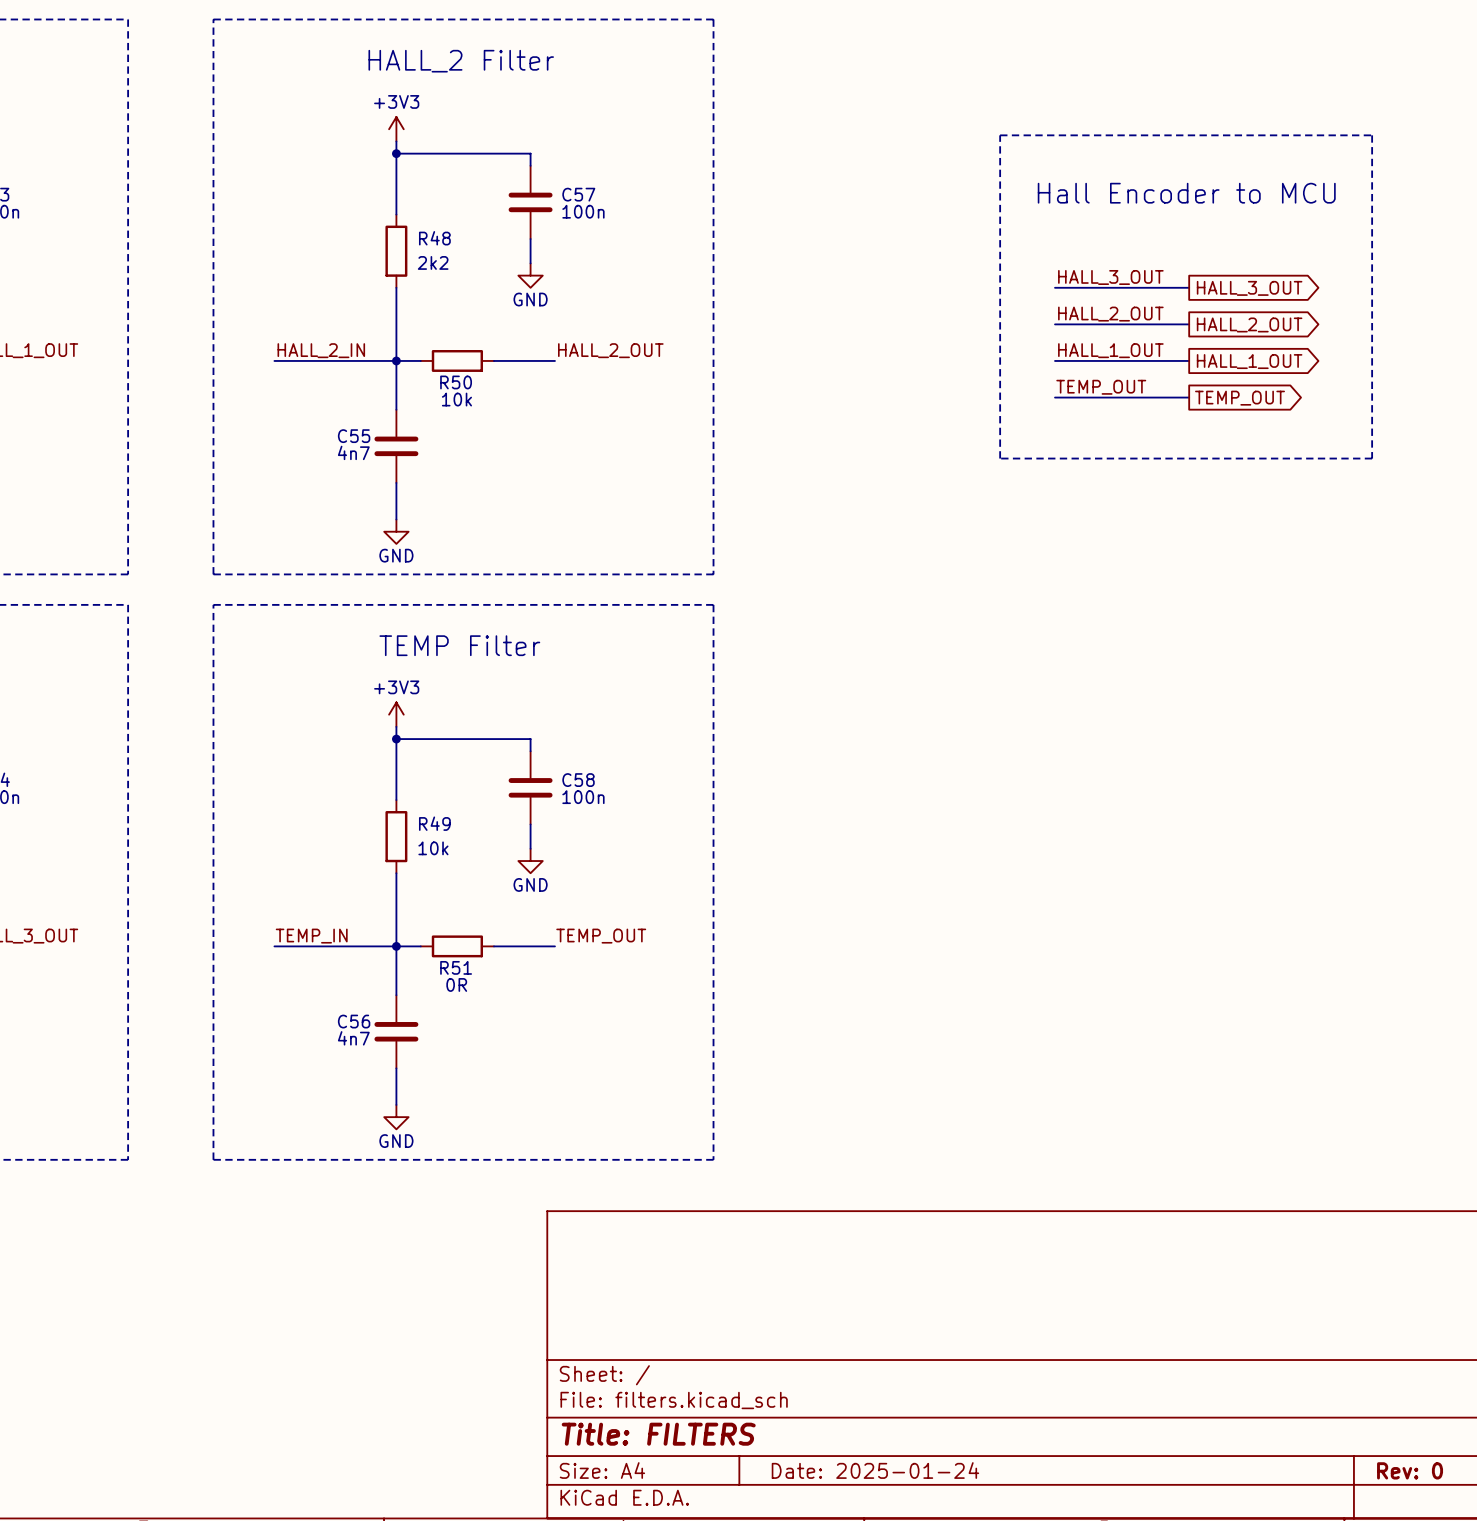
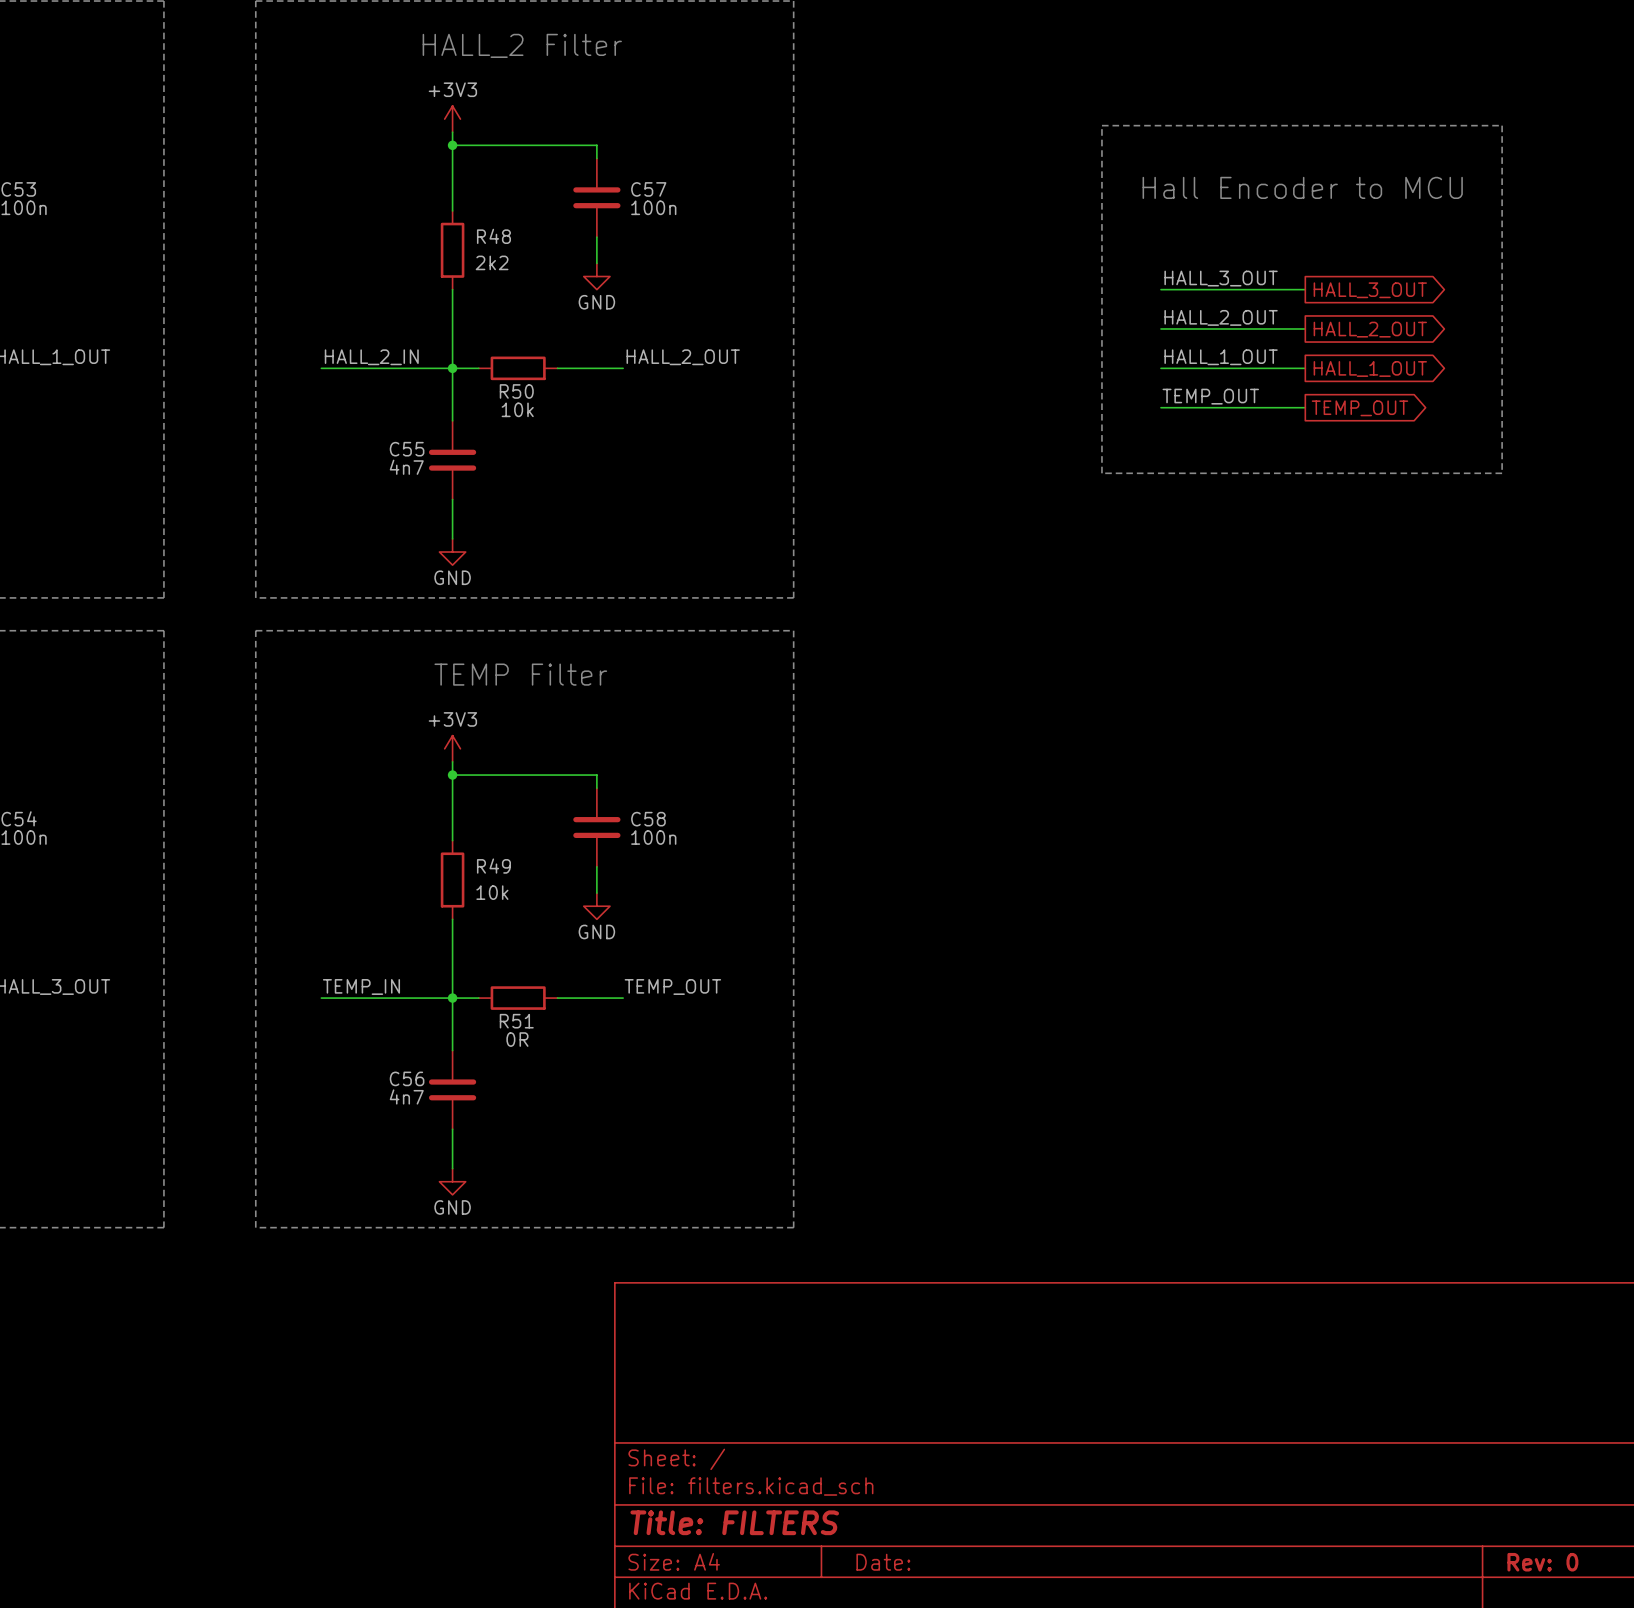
title block: Date: 2025-01-24 (875, 1470) -> Date: (883, 1562)

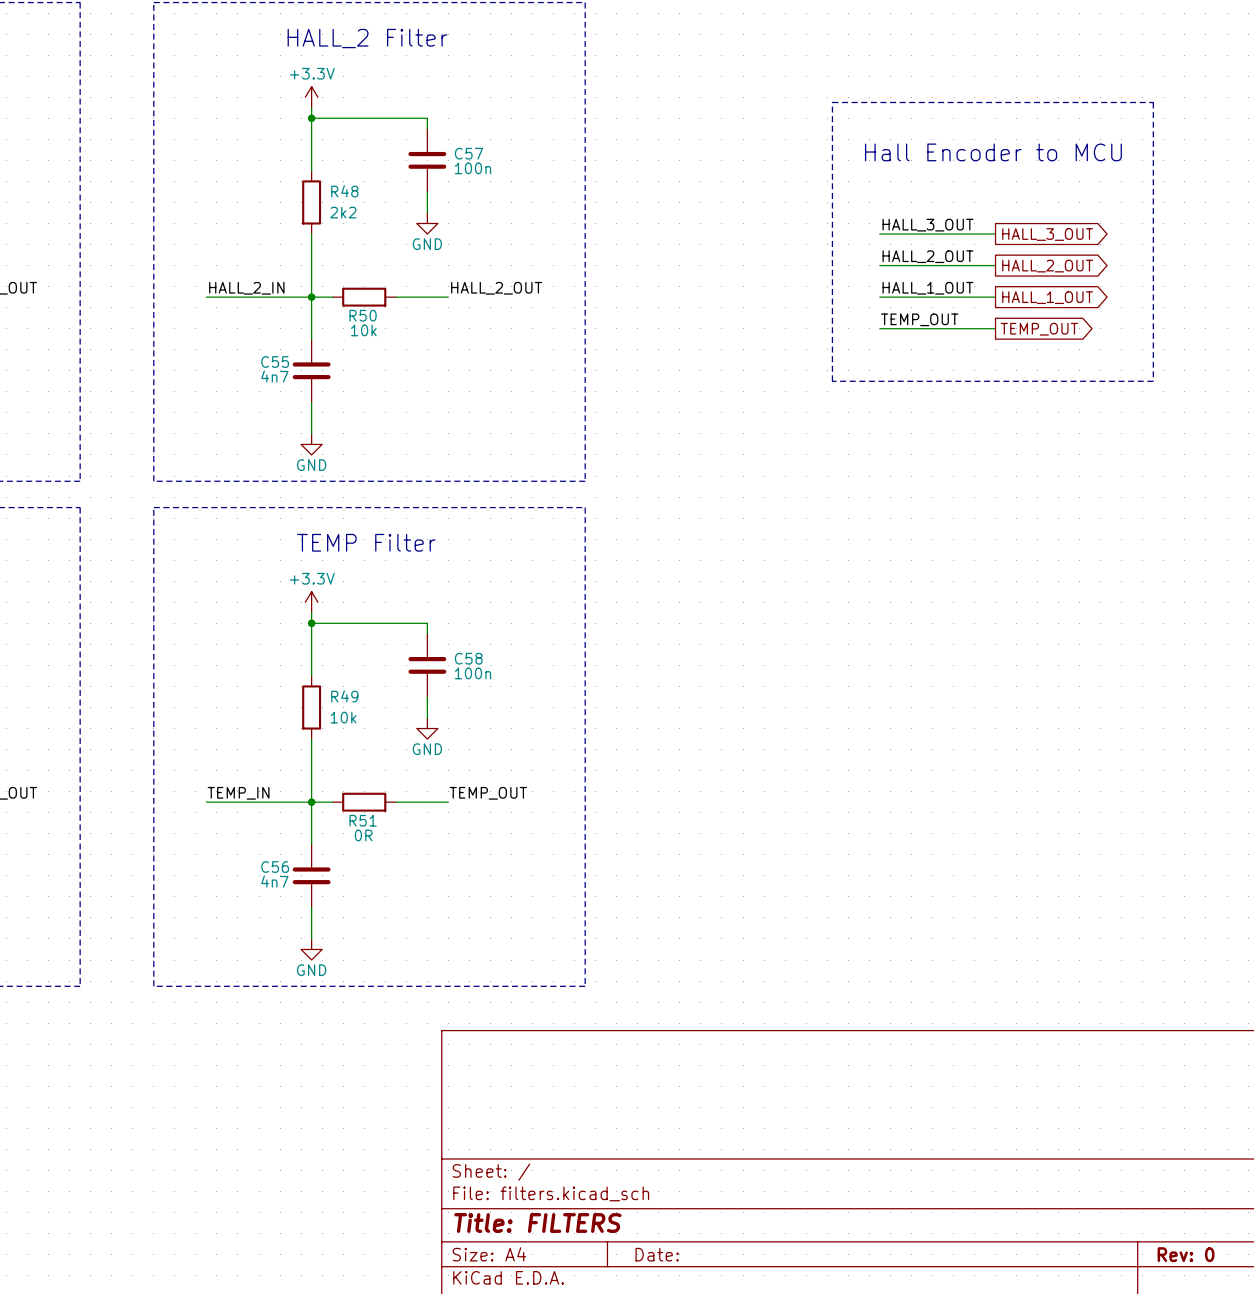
power symbol: +3V3 (452, 119) -> +3.3V (311, 97)
power symbol: +3V3 (452, 748) -> +3.3V (311, 602)

